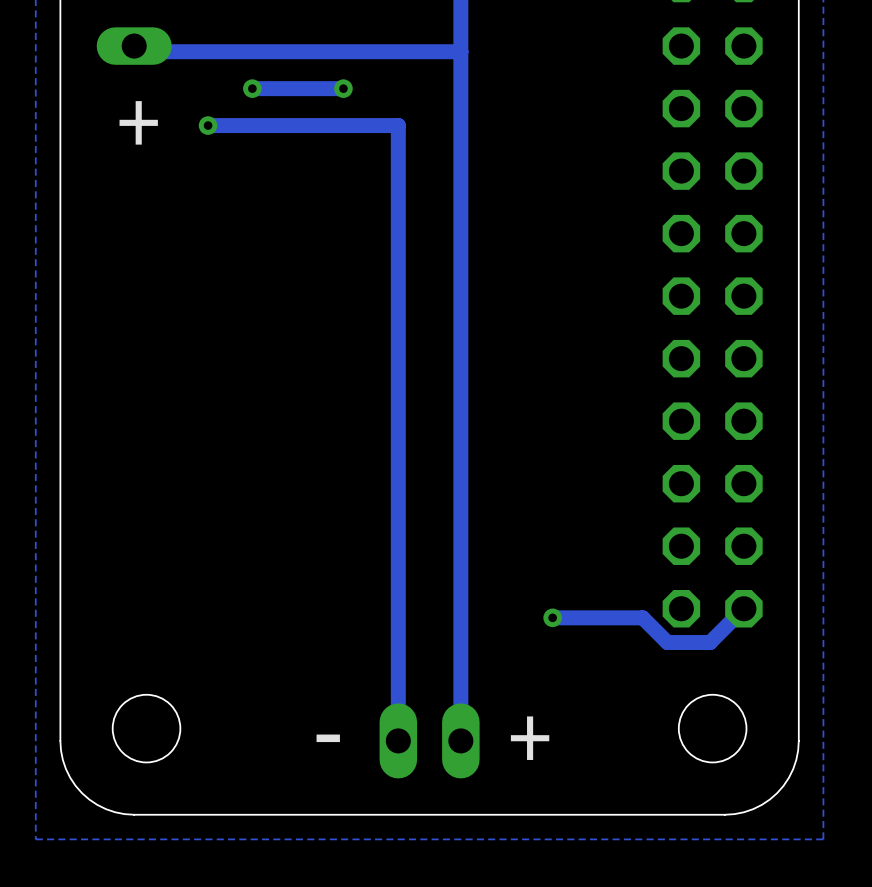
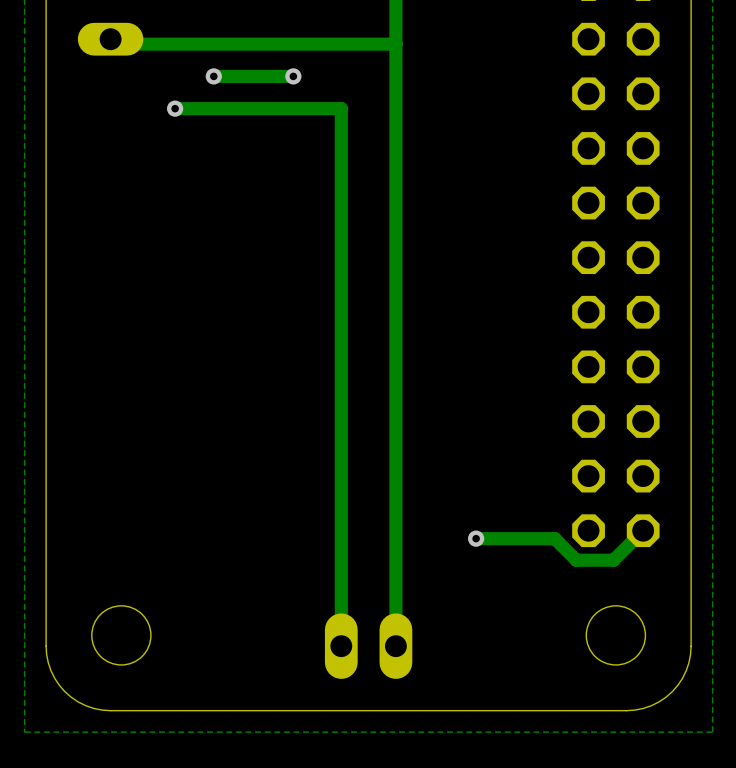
text: + (138, 122) -> none
text: - (328, 738) -> none
text: + (530, 738) -> none

